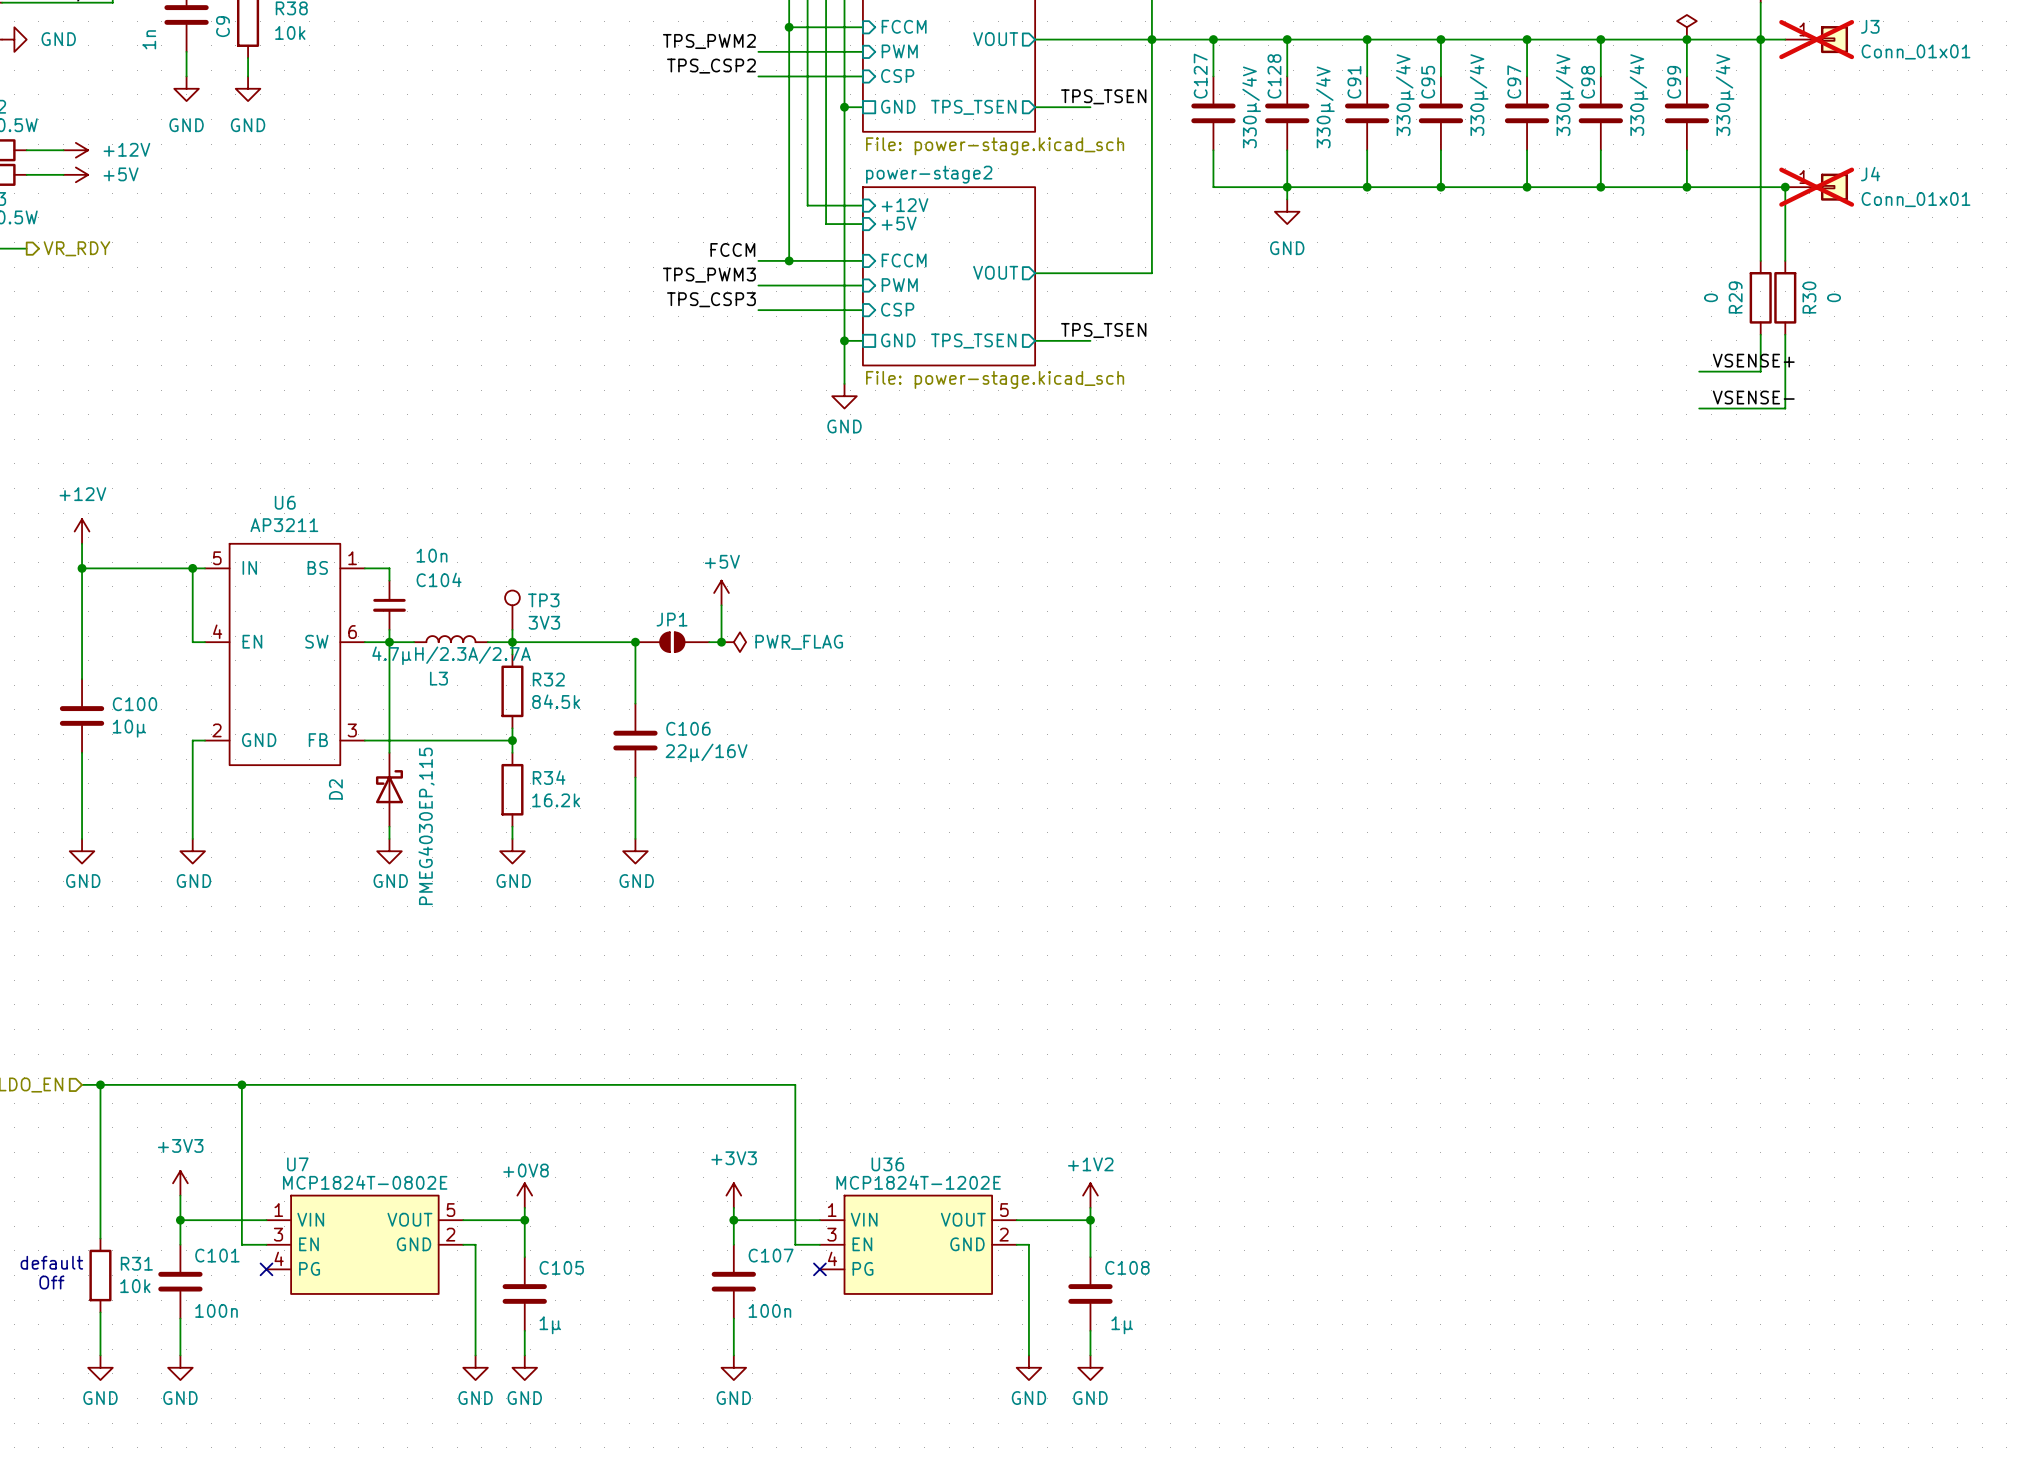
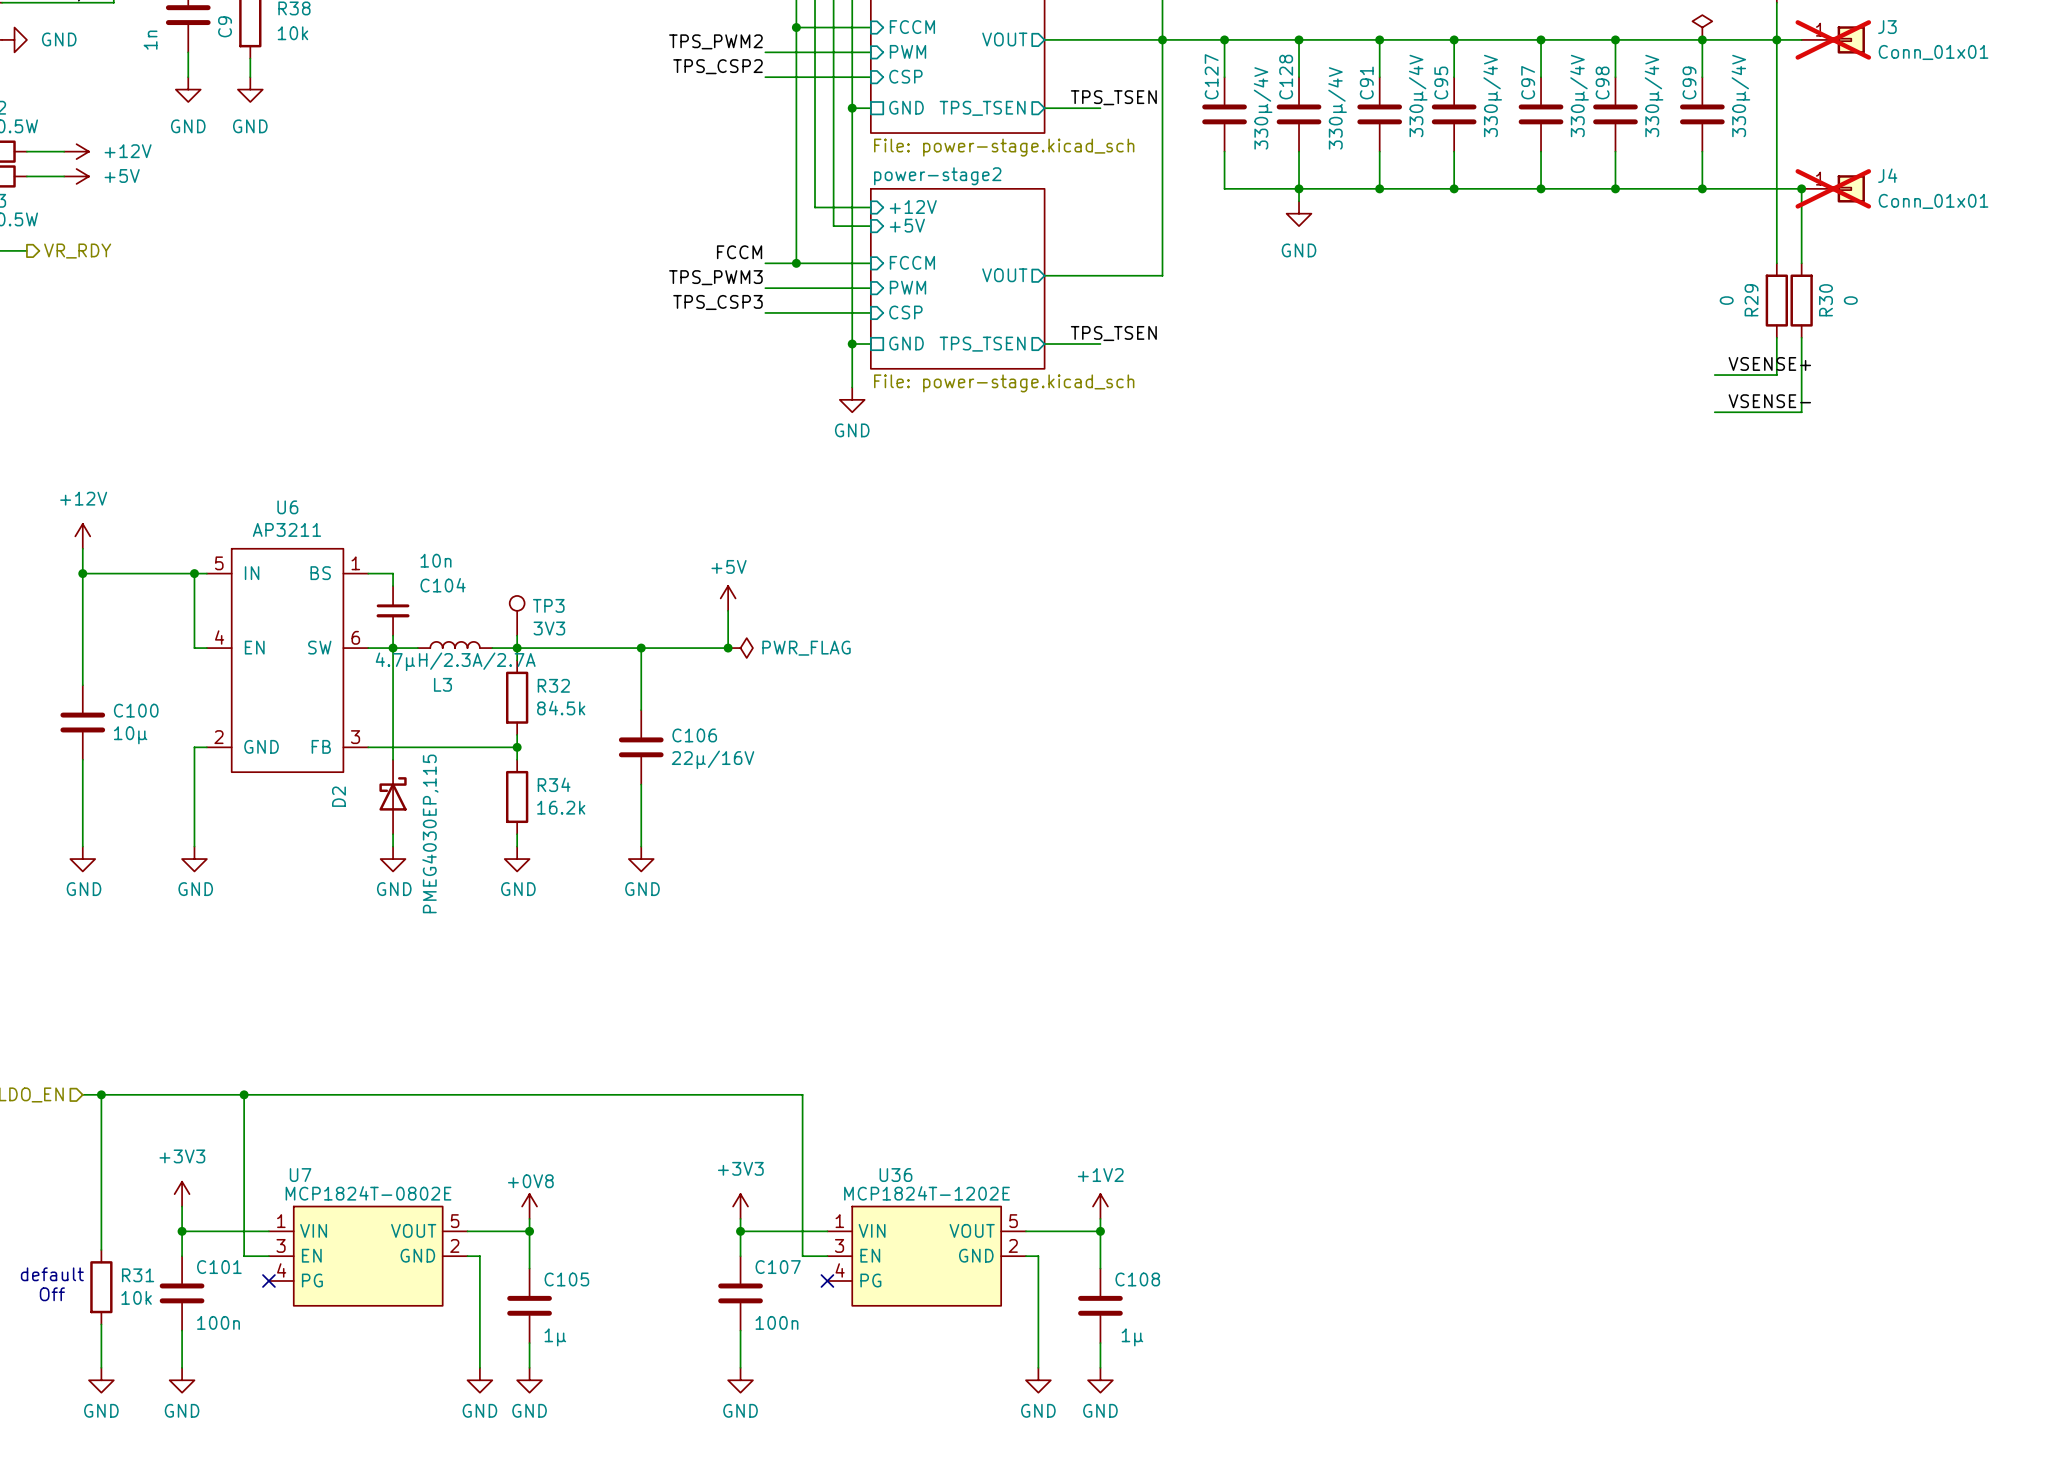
JP1: (672, 642) -> none

